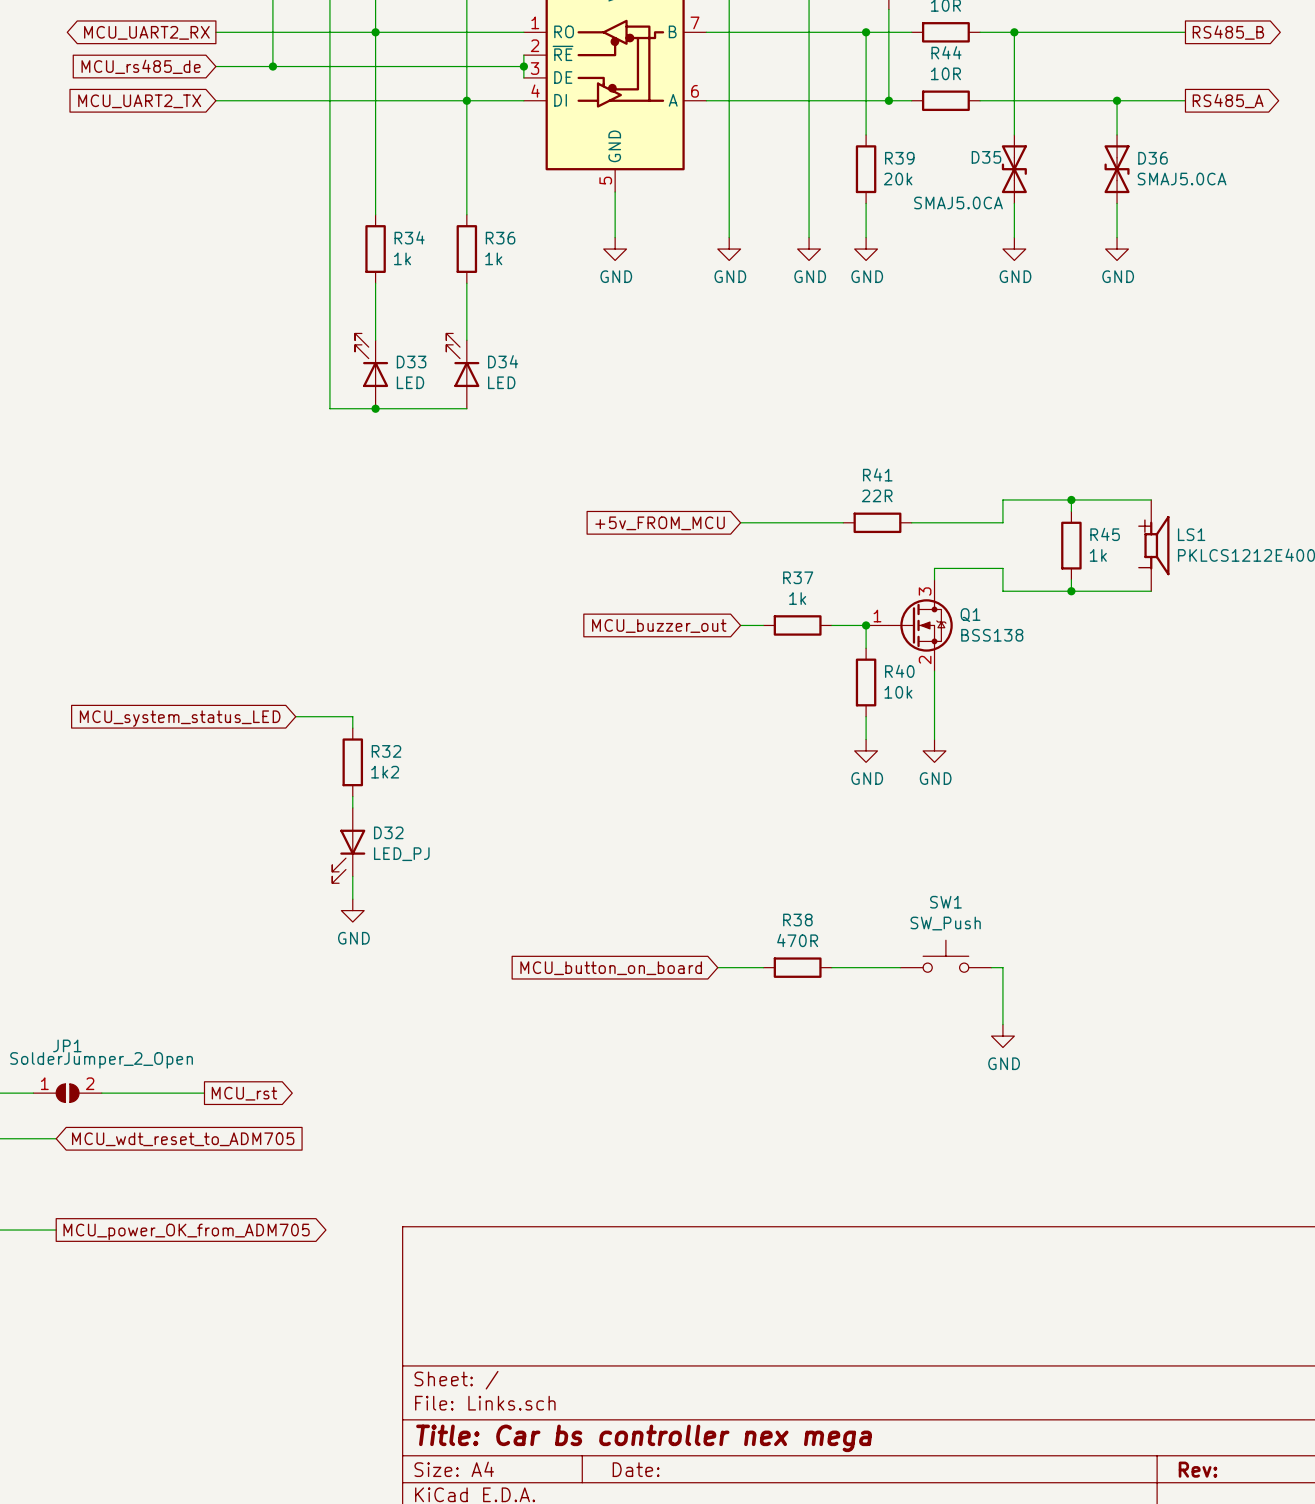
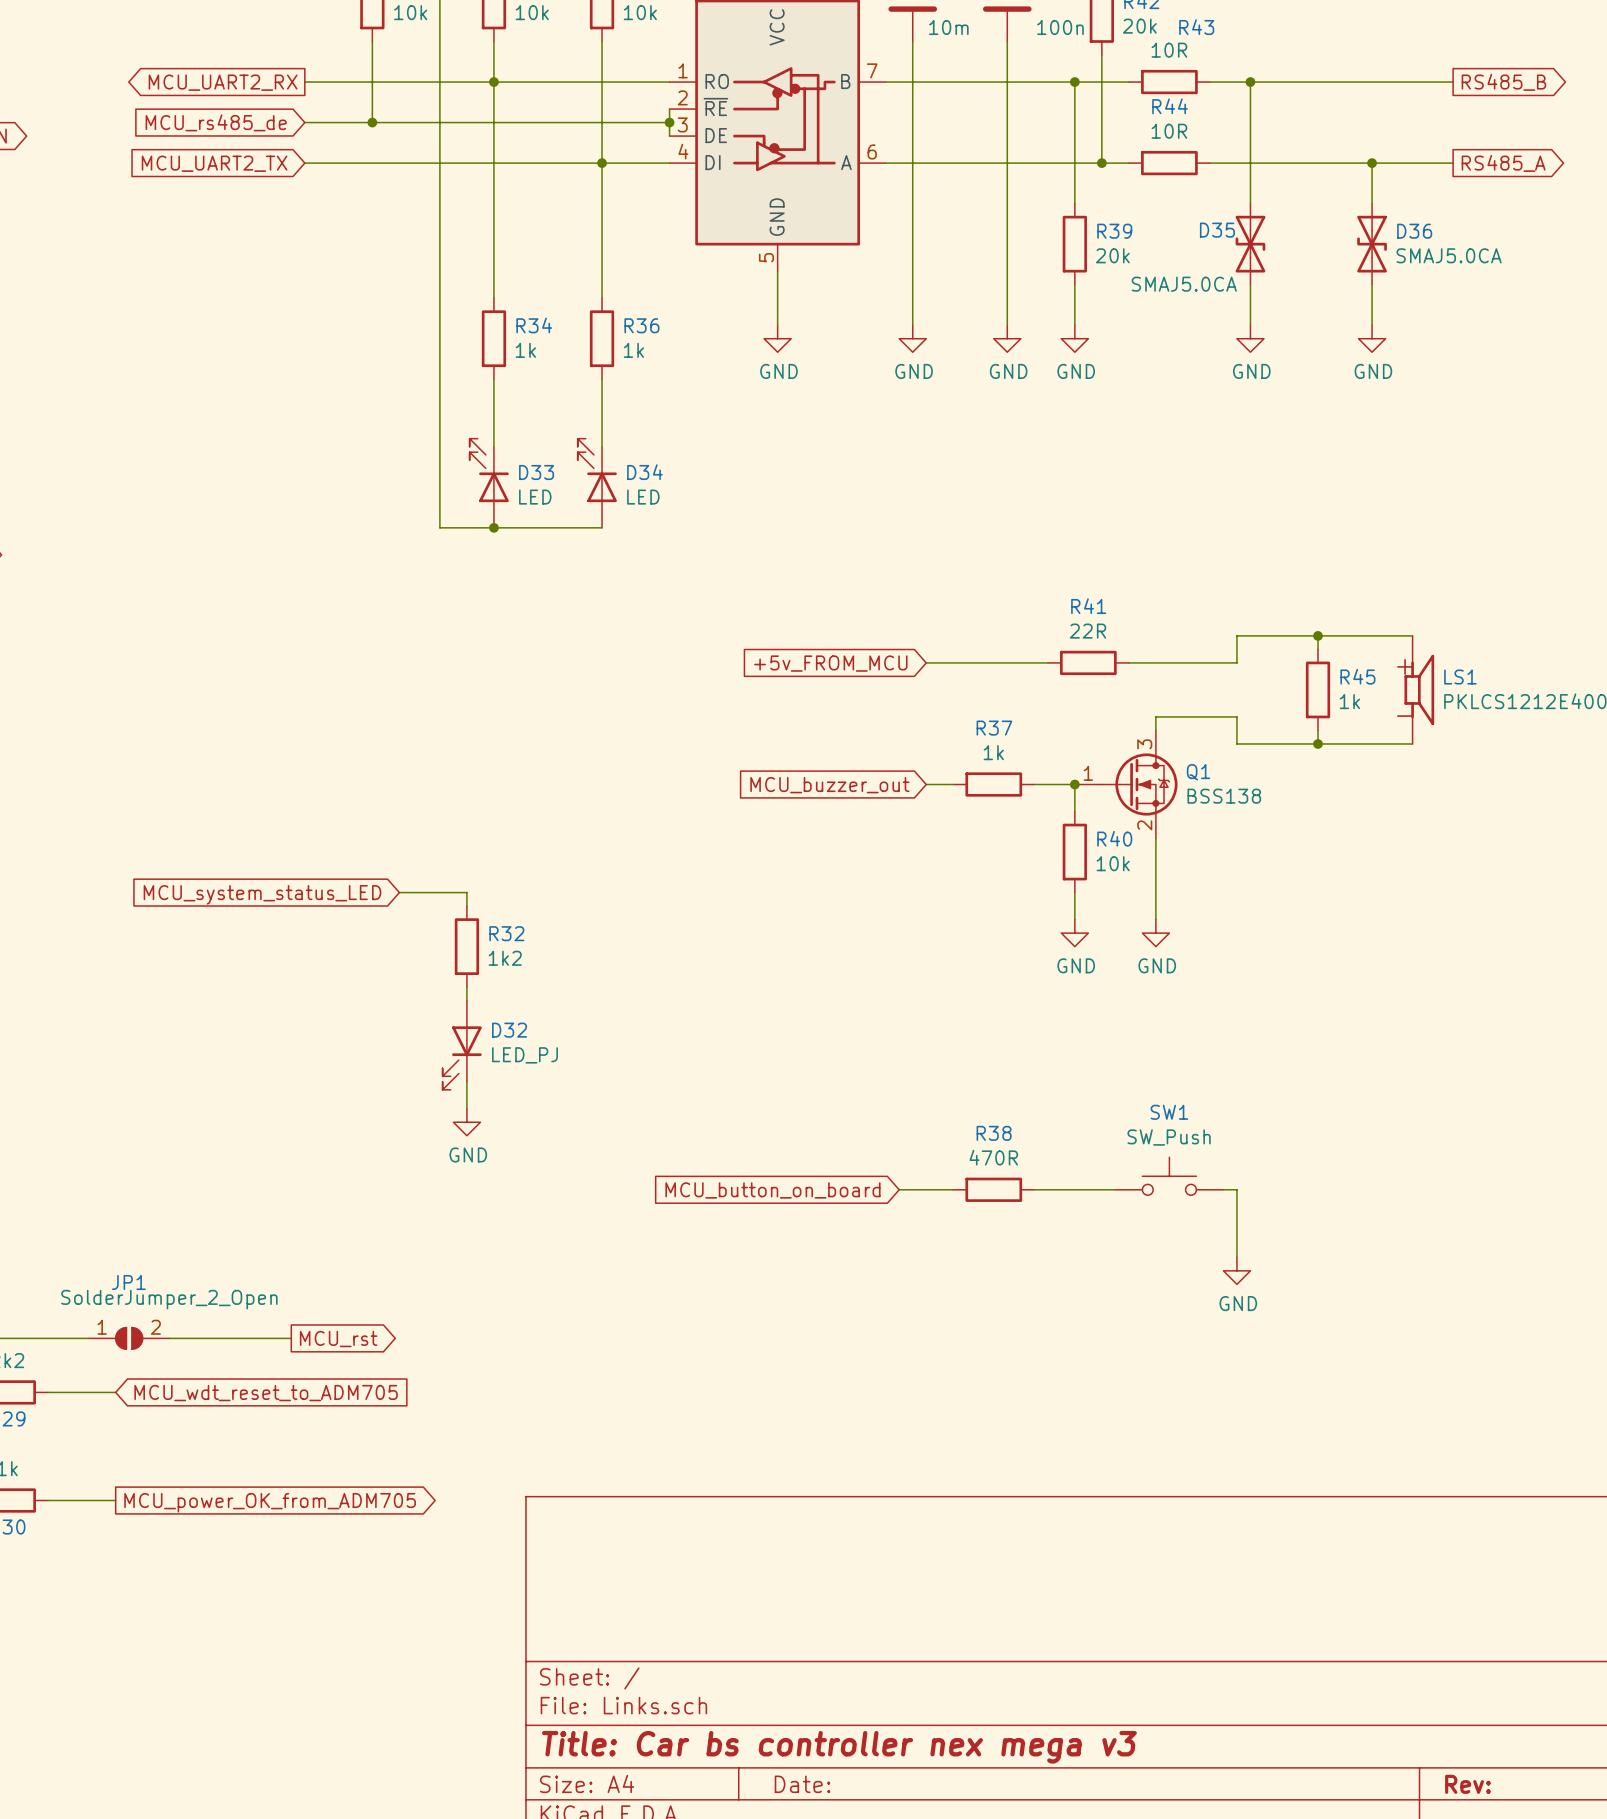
title block: Title: Car bs controller nex mega (644, 1438) -> Title: Car bs controller nex mega v3 (839, 1747)

